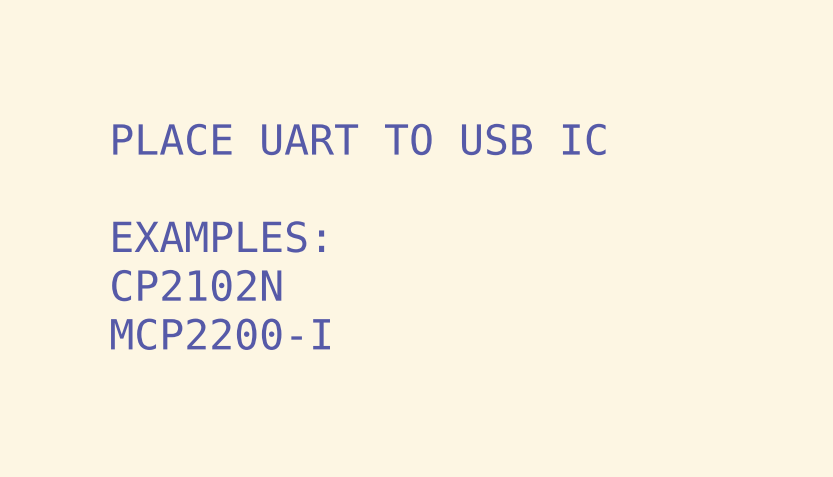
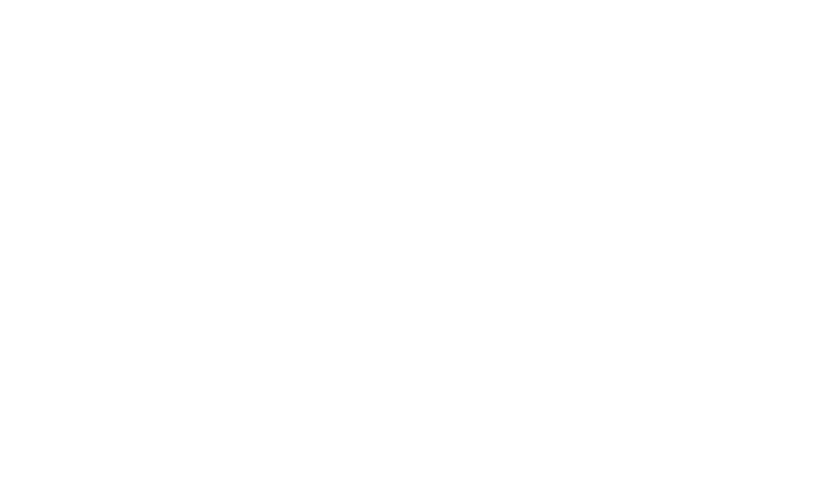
text: PLACE UART TO USB IC (359, 139) -> none
text: EXAMPLES: (218, 236) -> none
text: CP2102N (196, 285) -> none
text: MCP2200-I (220, 334) -> none

